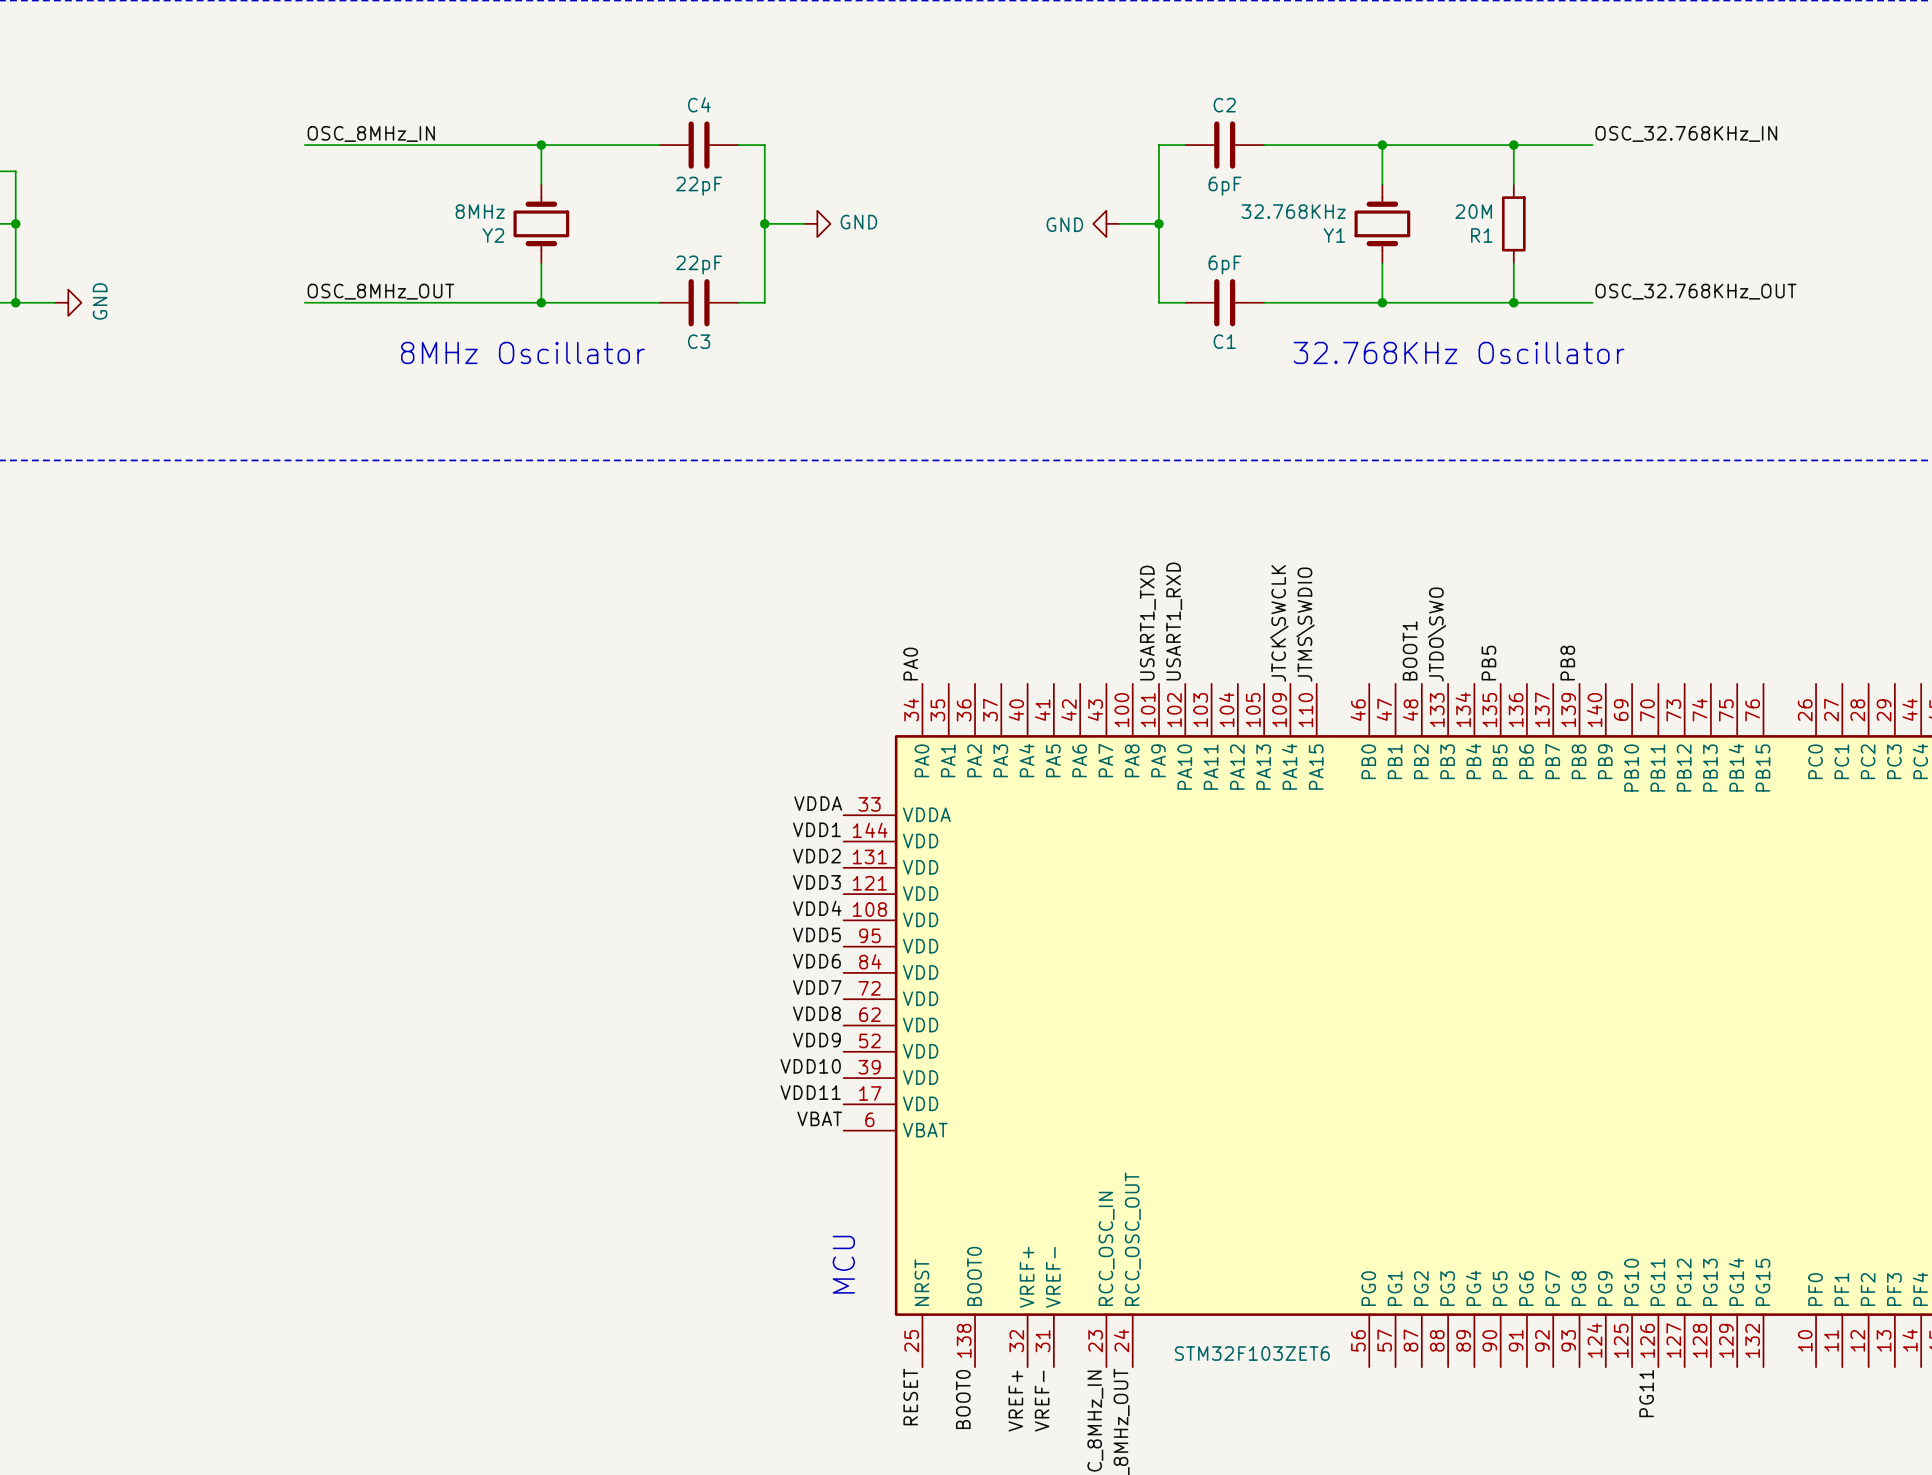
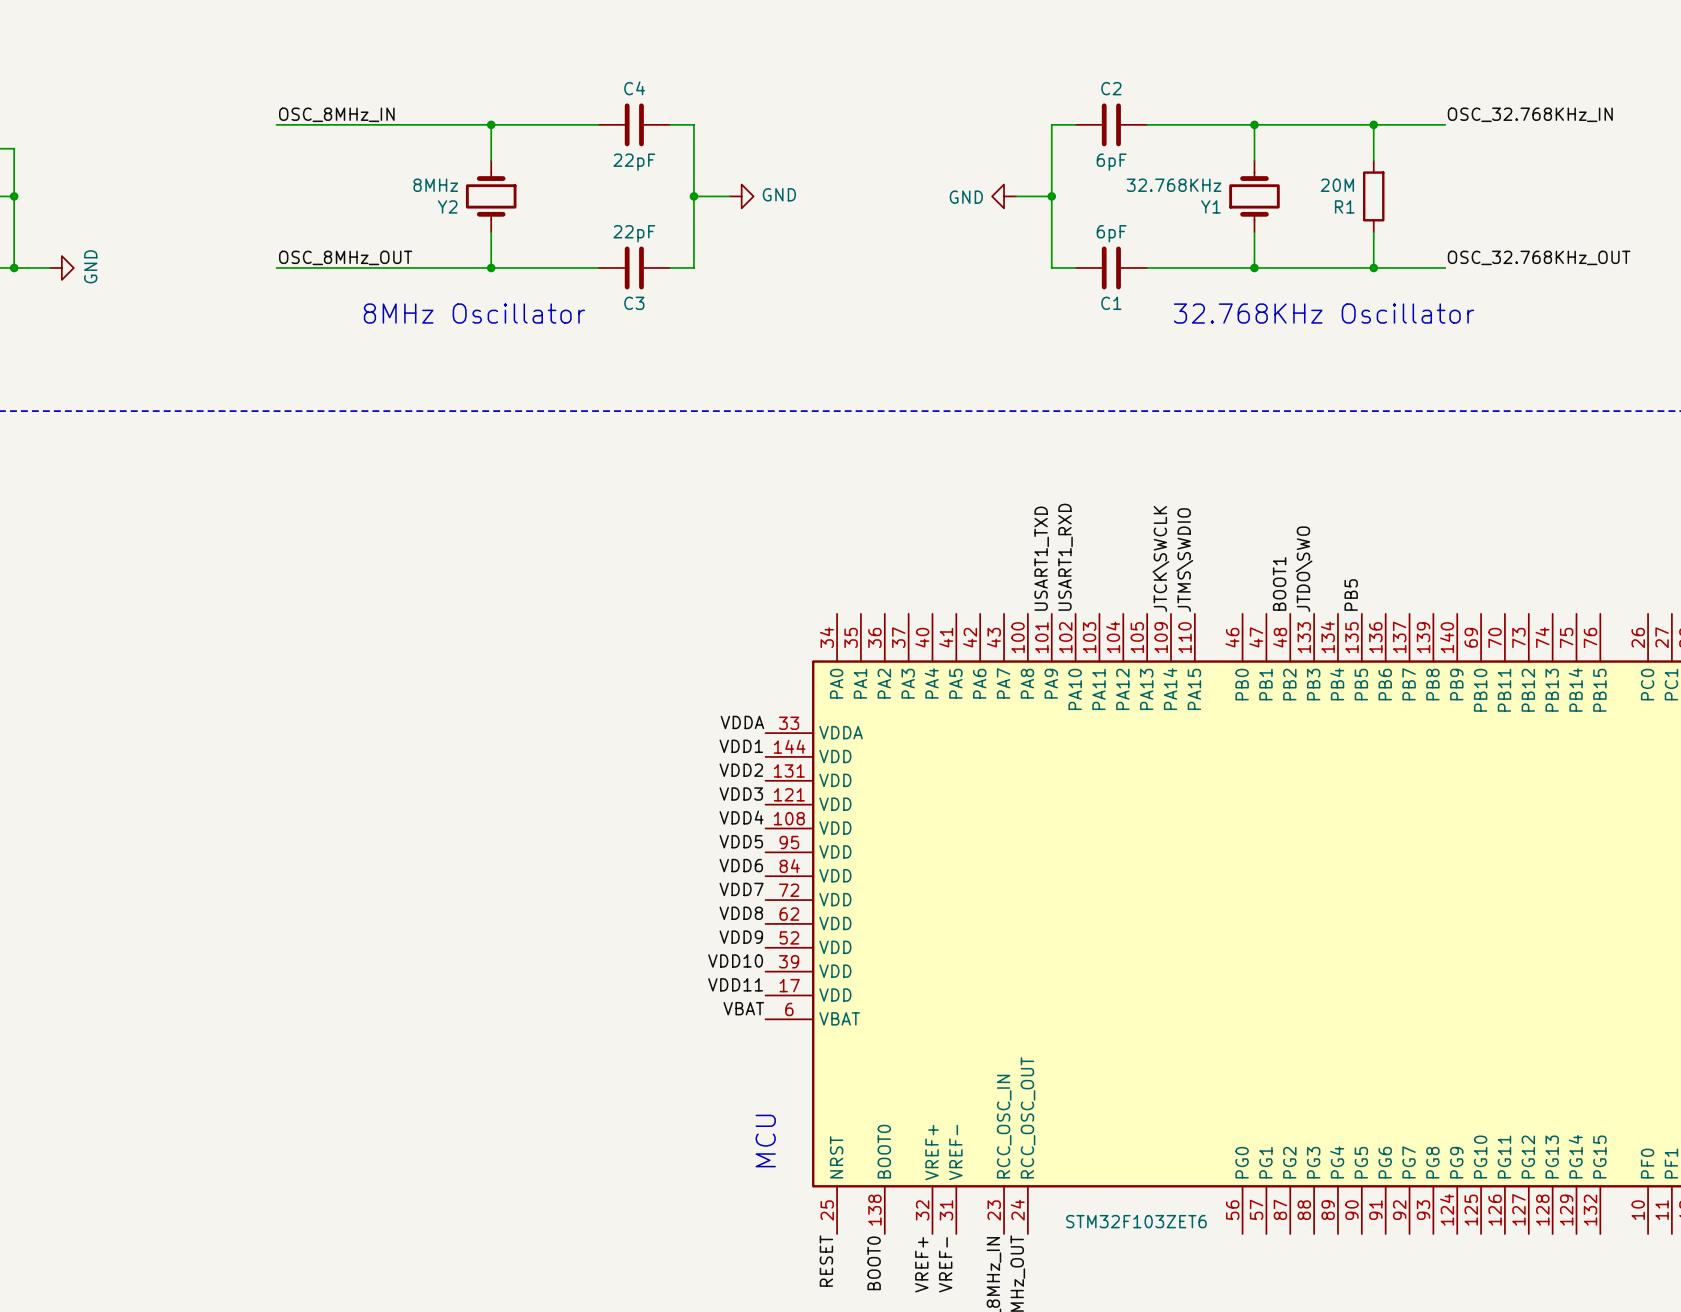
label: PB8 (1567, 663) -> none
label: PA0 (910, 664) -> none
label: PG11 (1646, 1393) -> none

